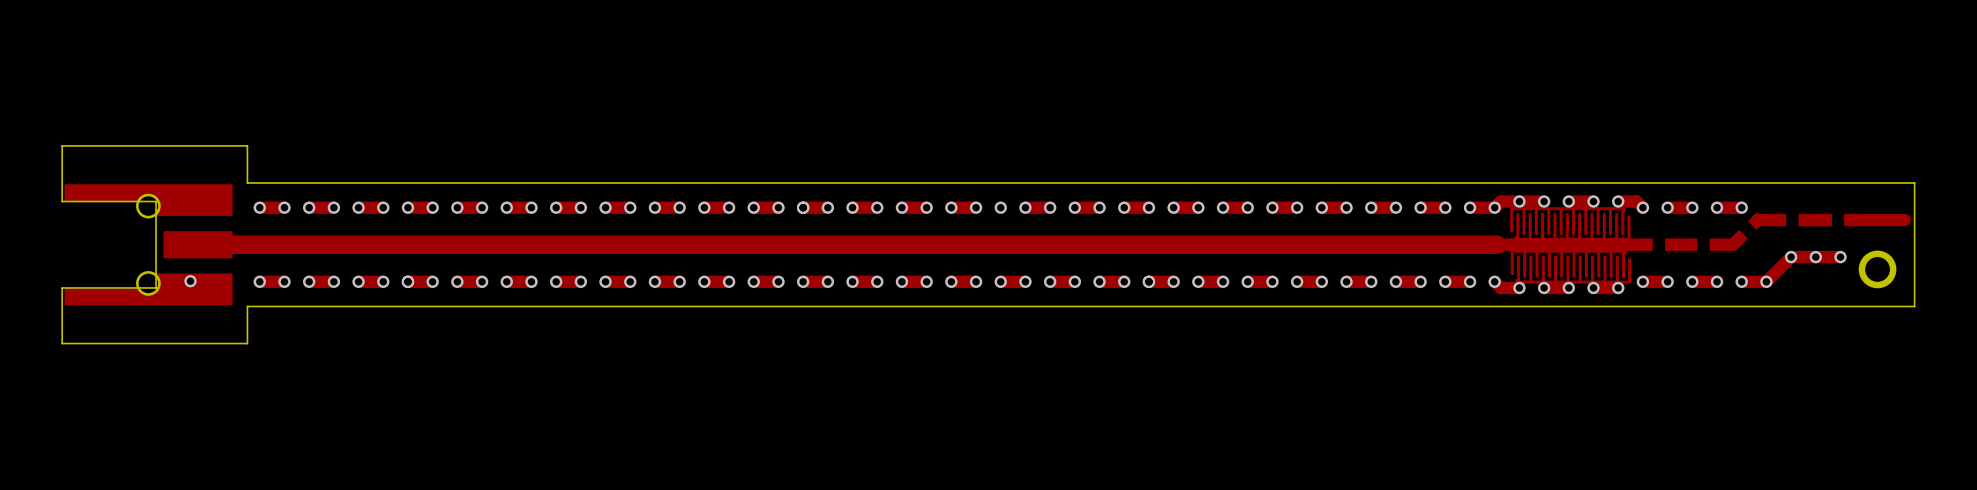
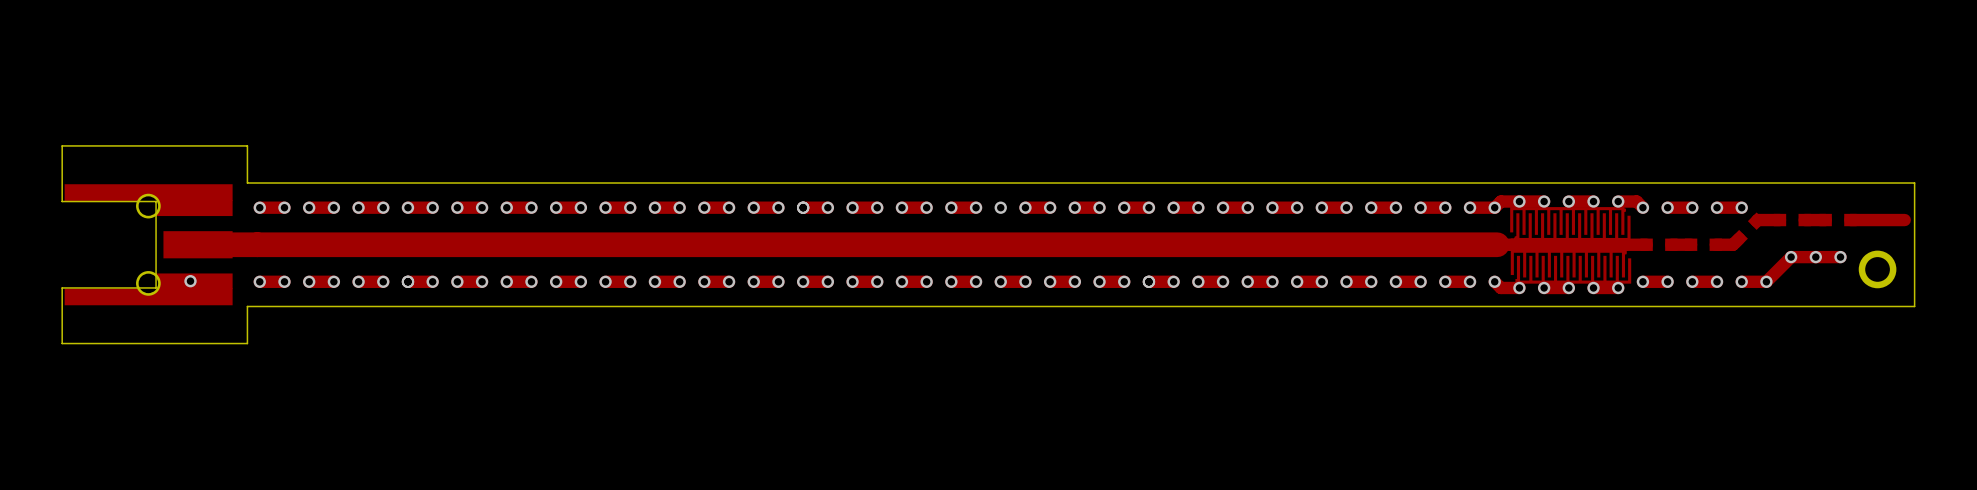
top track width: thin (198, 244) (1497, 244) -> thick (198, 244) (1497, 244)

